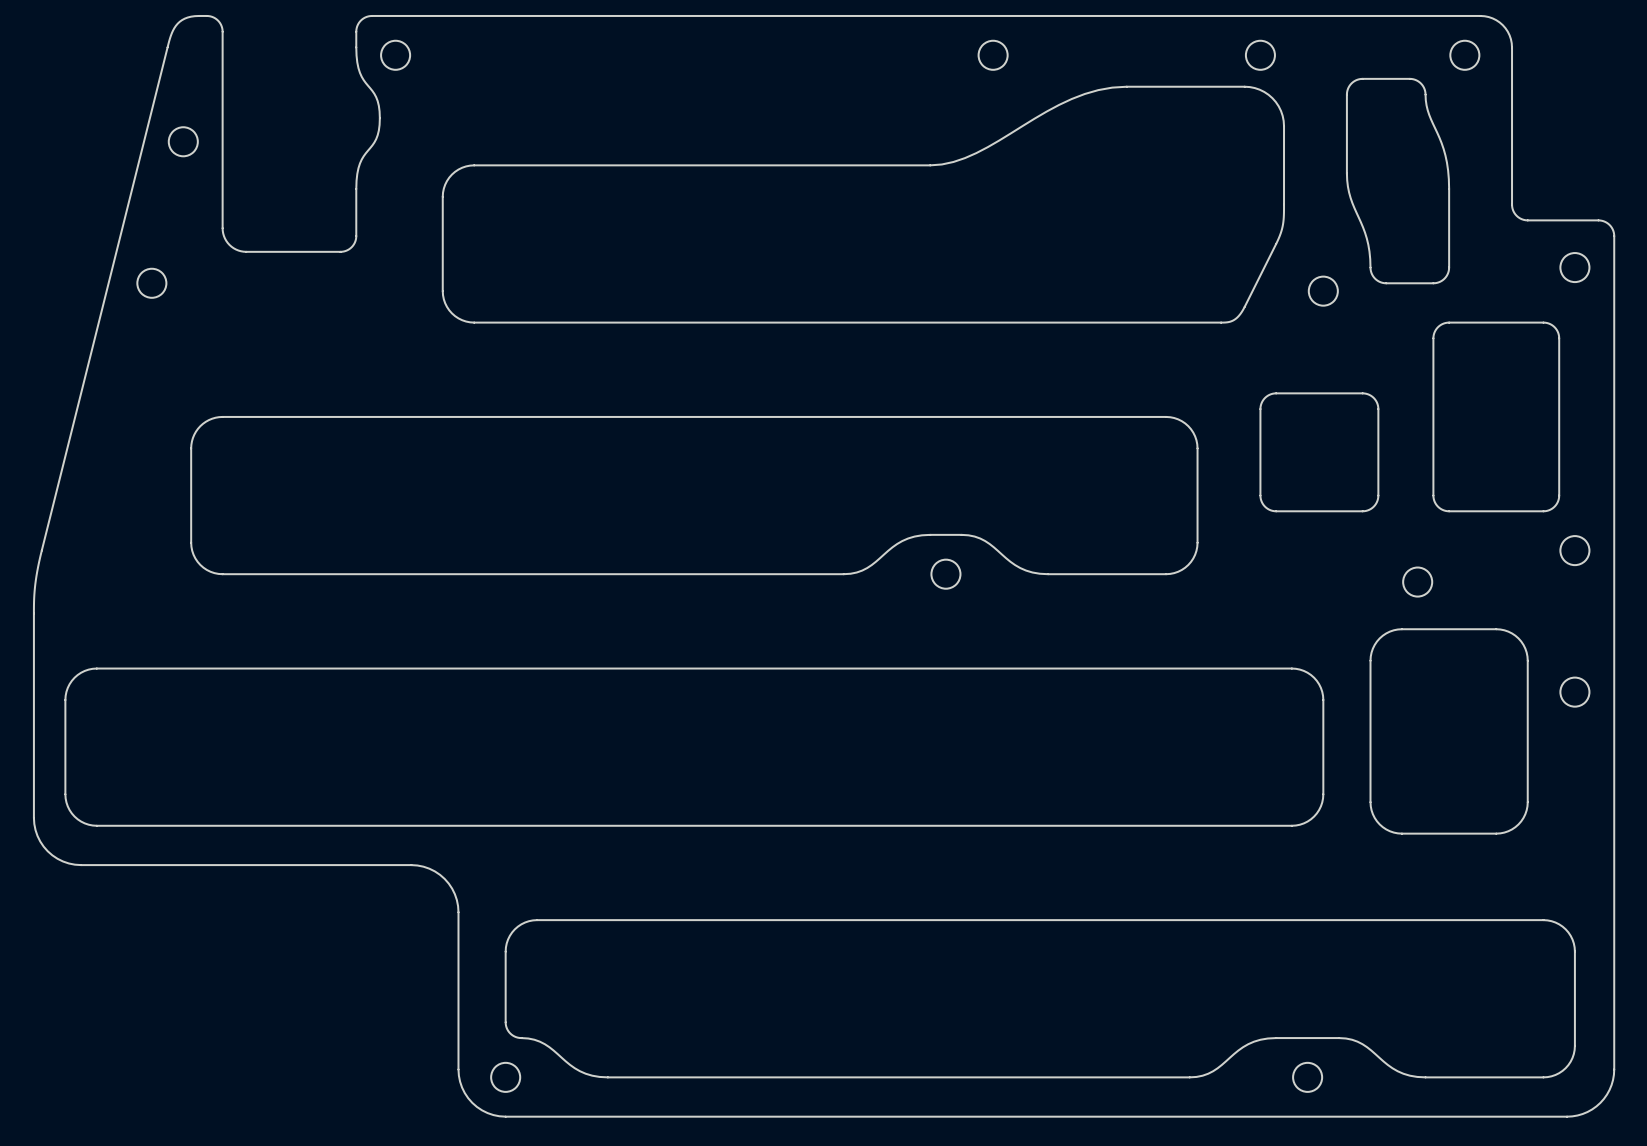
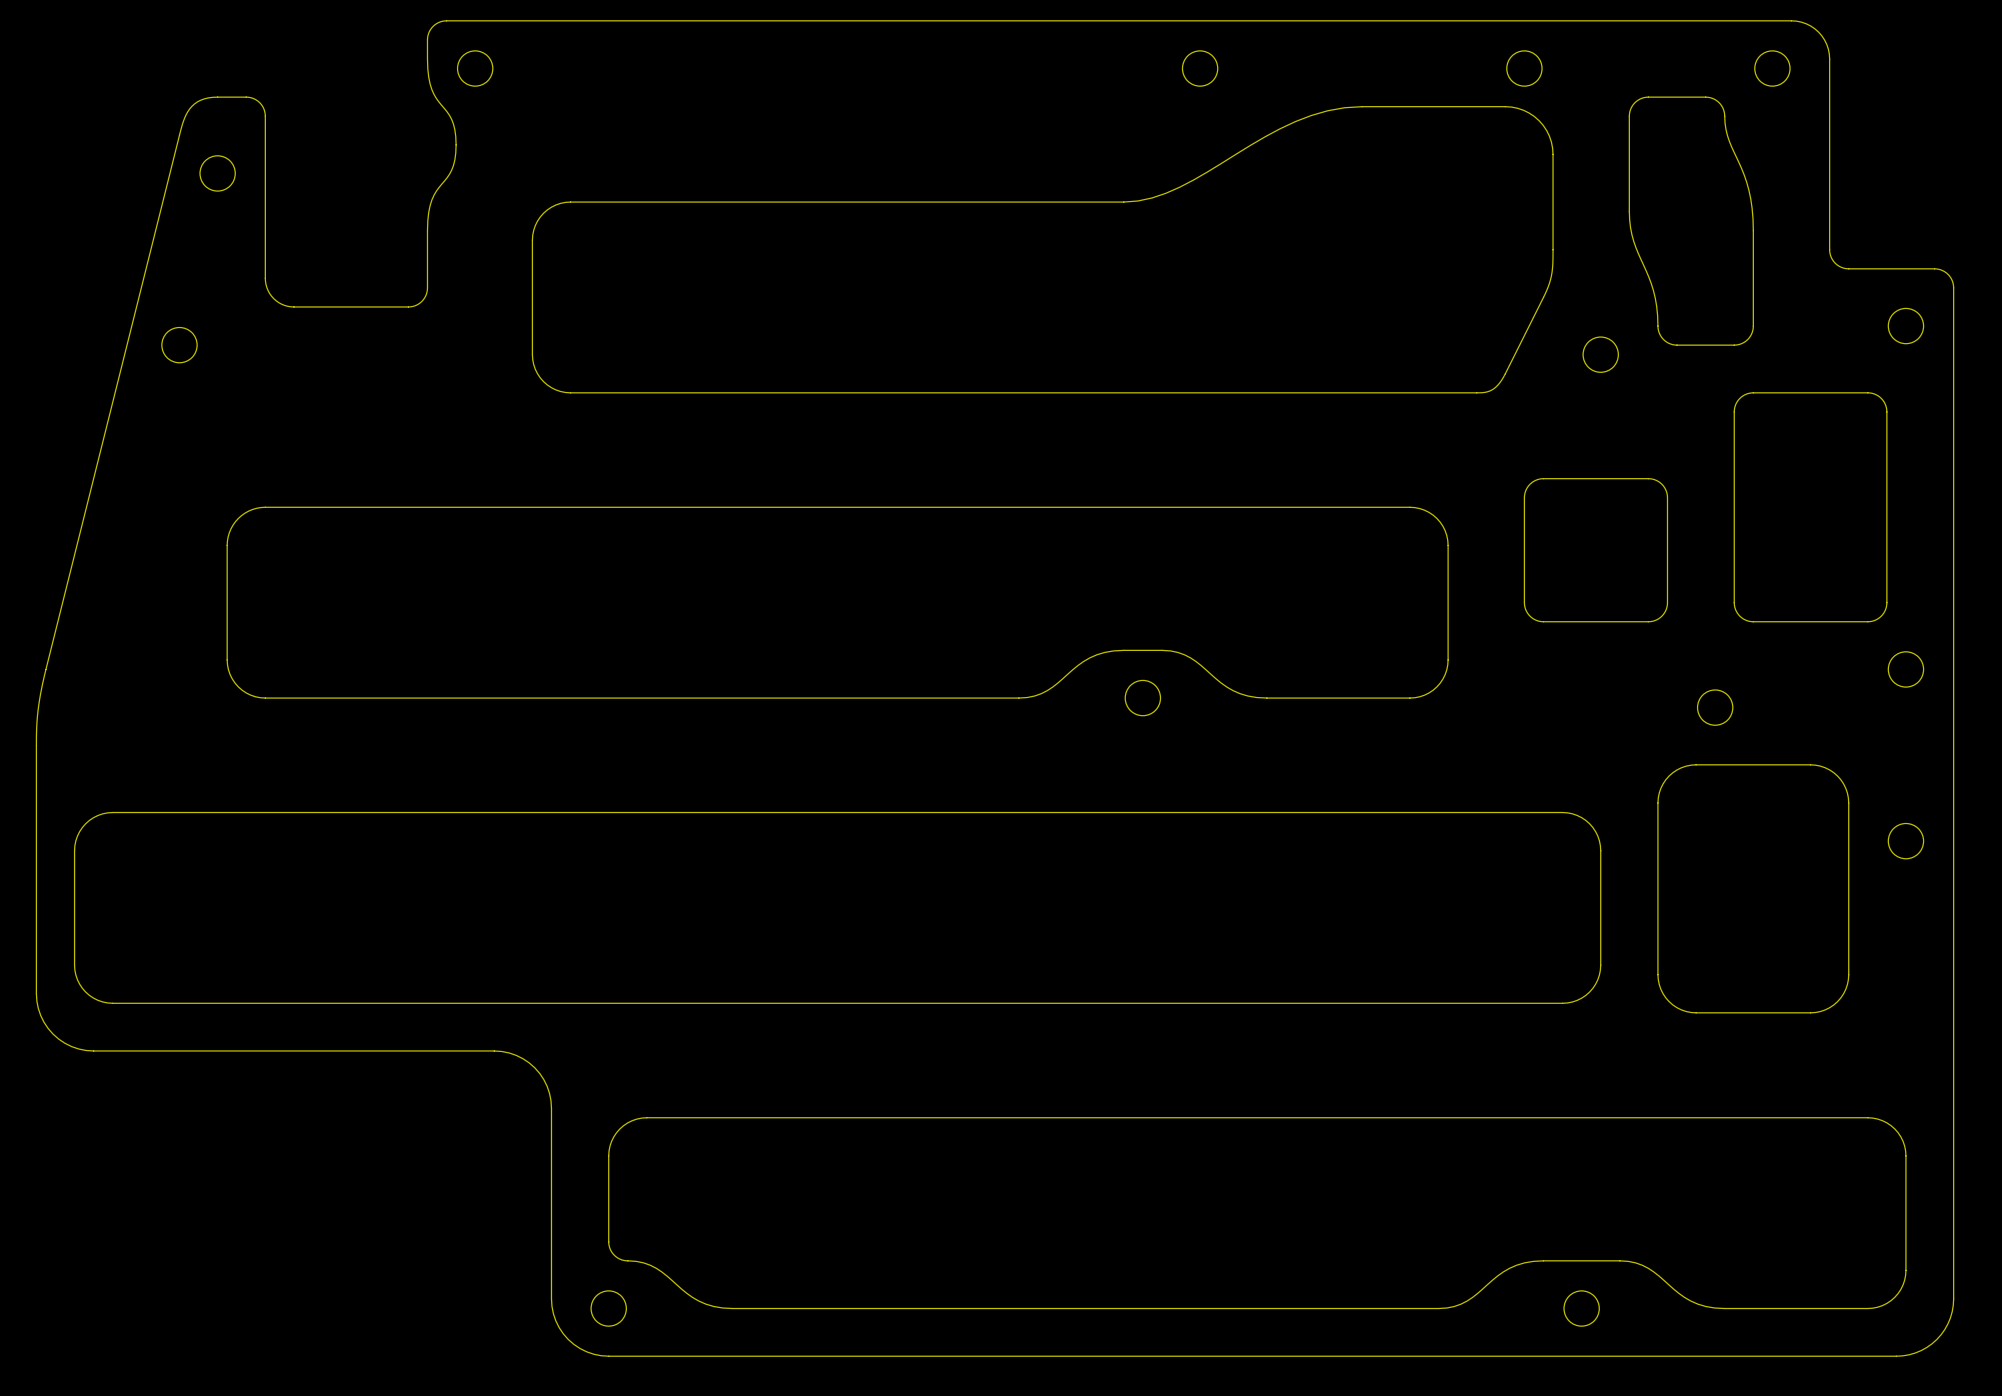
board edge: (222, 94) (221, 26) (218, 20) (212, 16) (191, 16) (179, 21) (171, 33) (151, 110) -> (265, 116) (261, 104) (252, 98) (207, 97) (197, 102) (189, 109) (179, 135)

